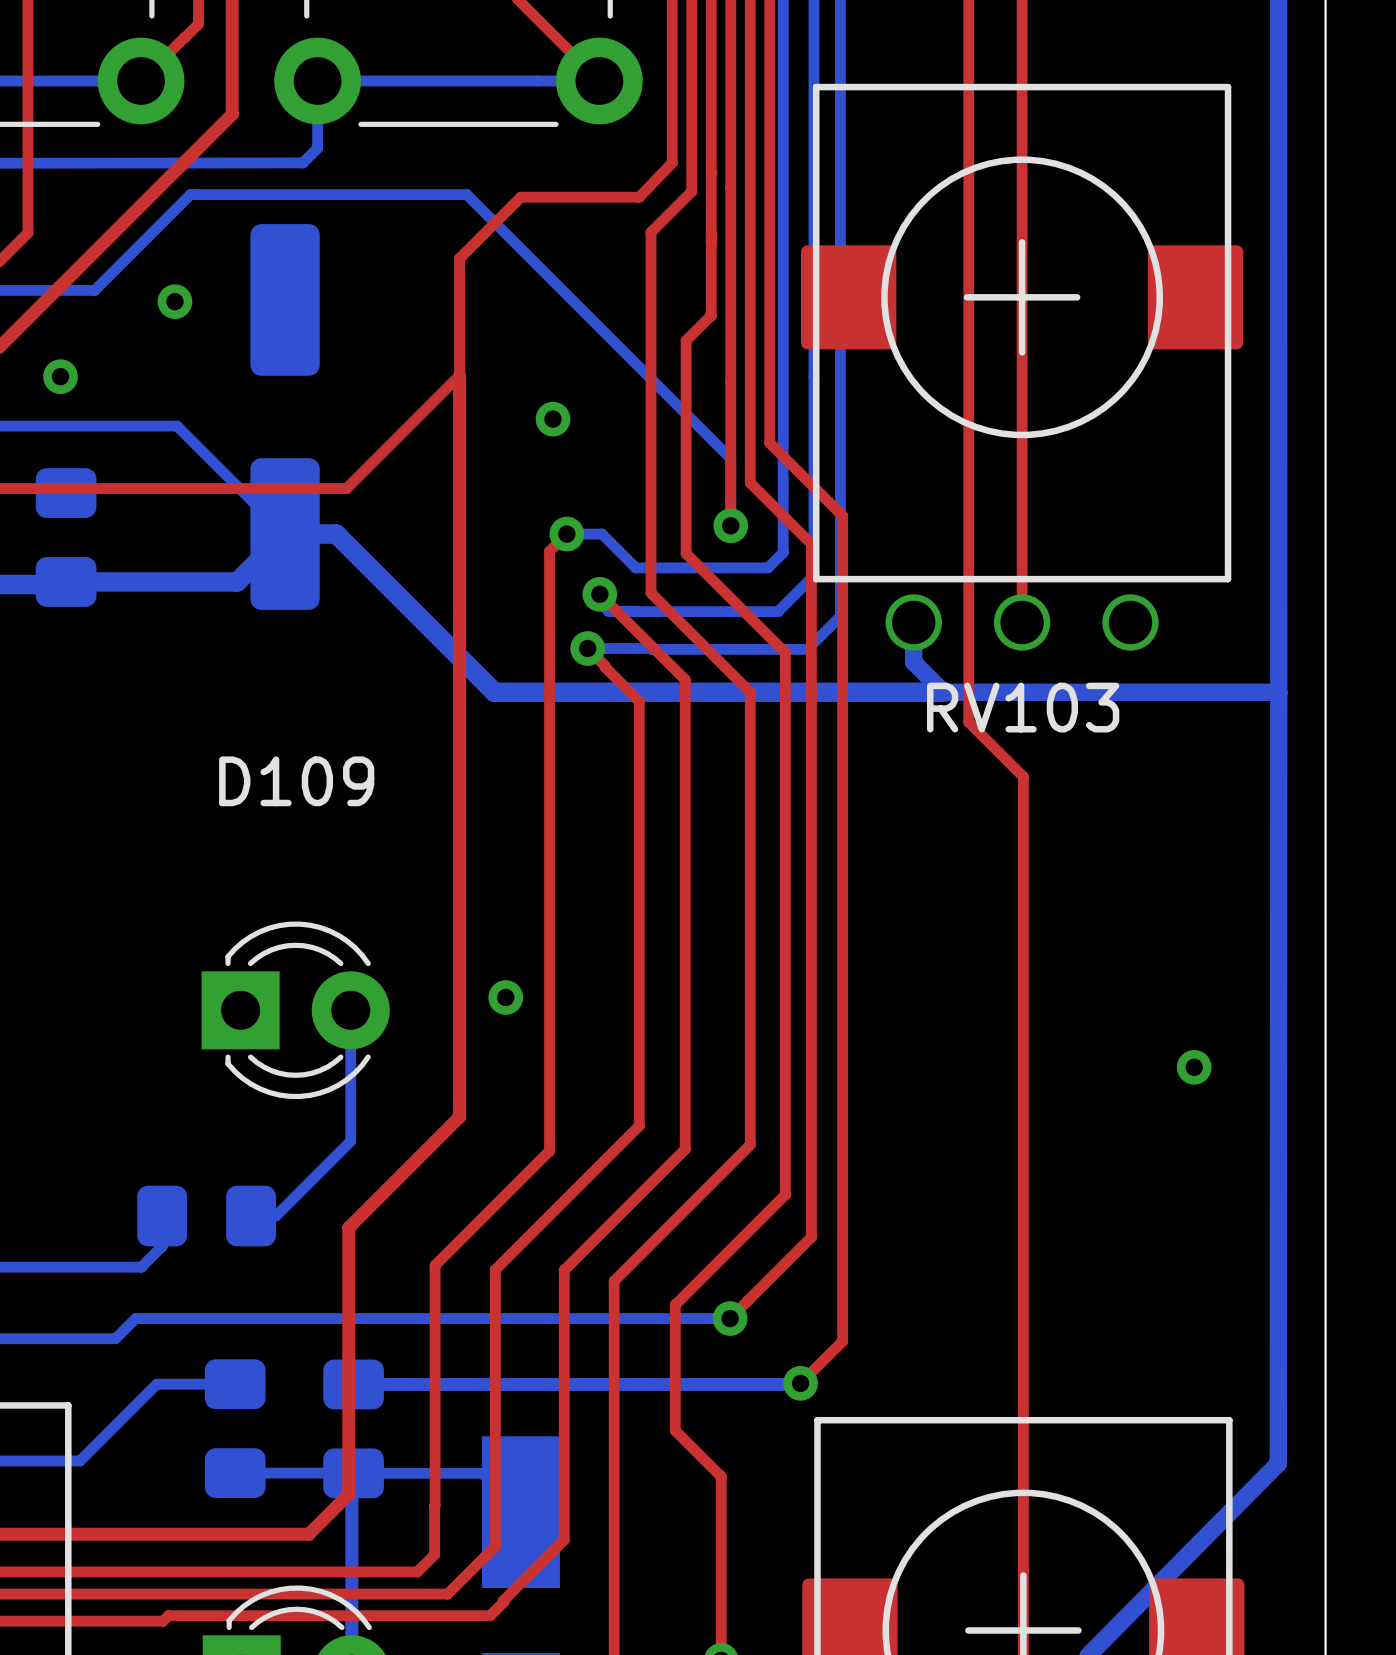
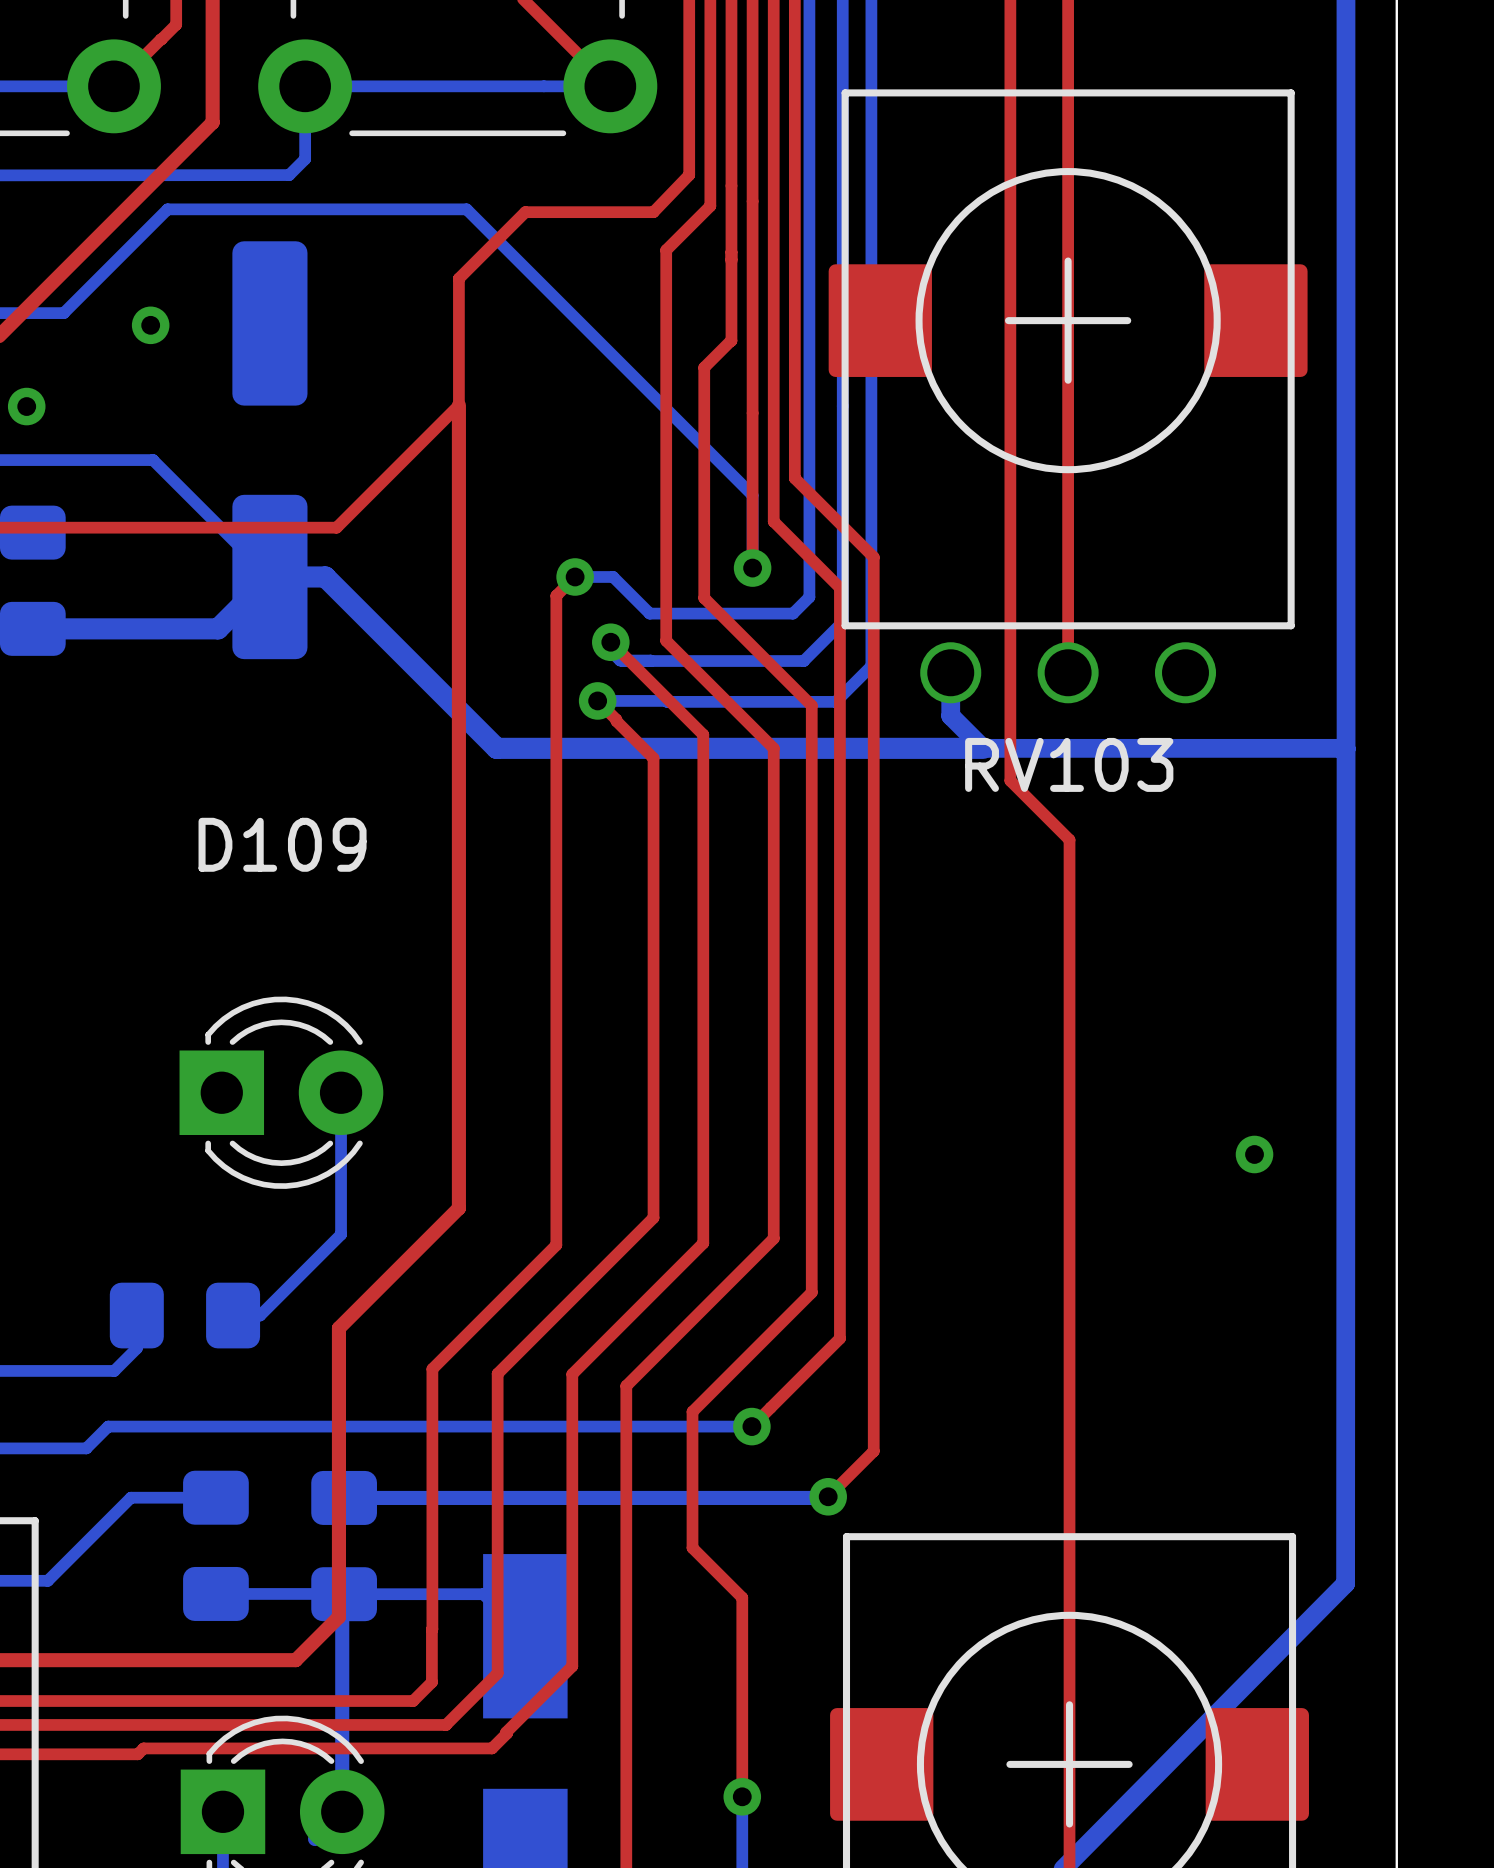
via: (553, 419) -> none
via: (505, 997) -> none

